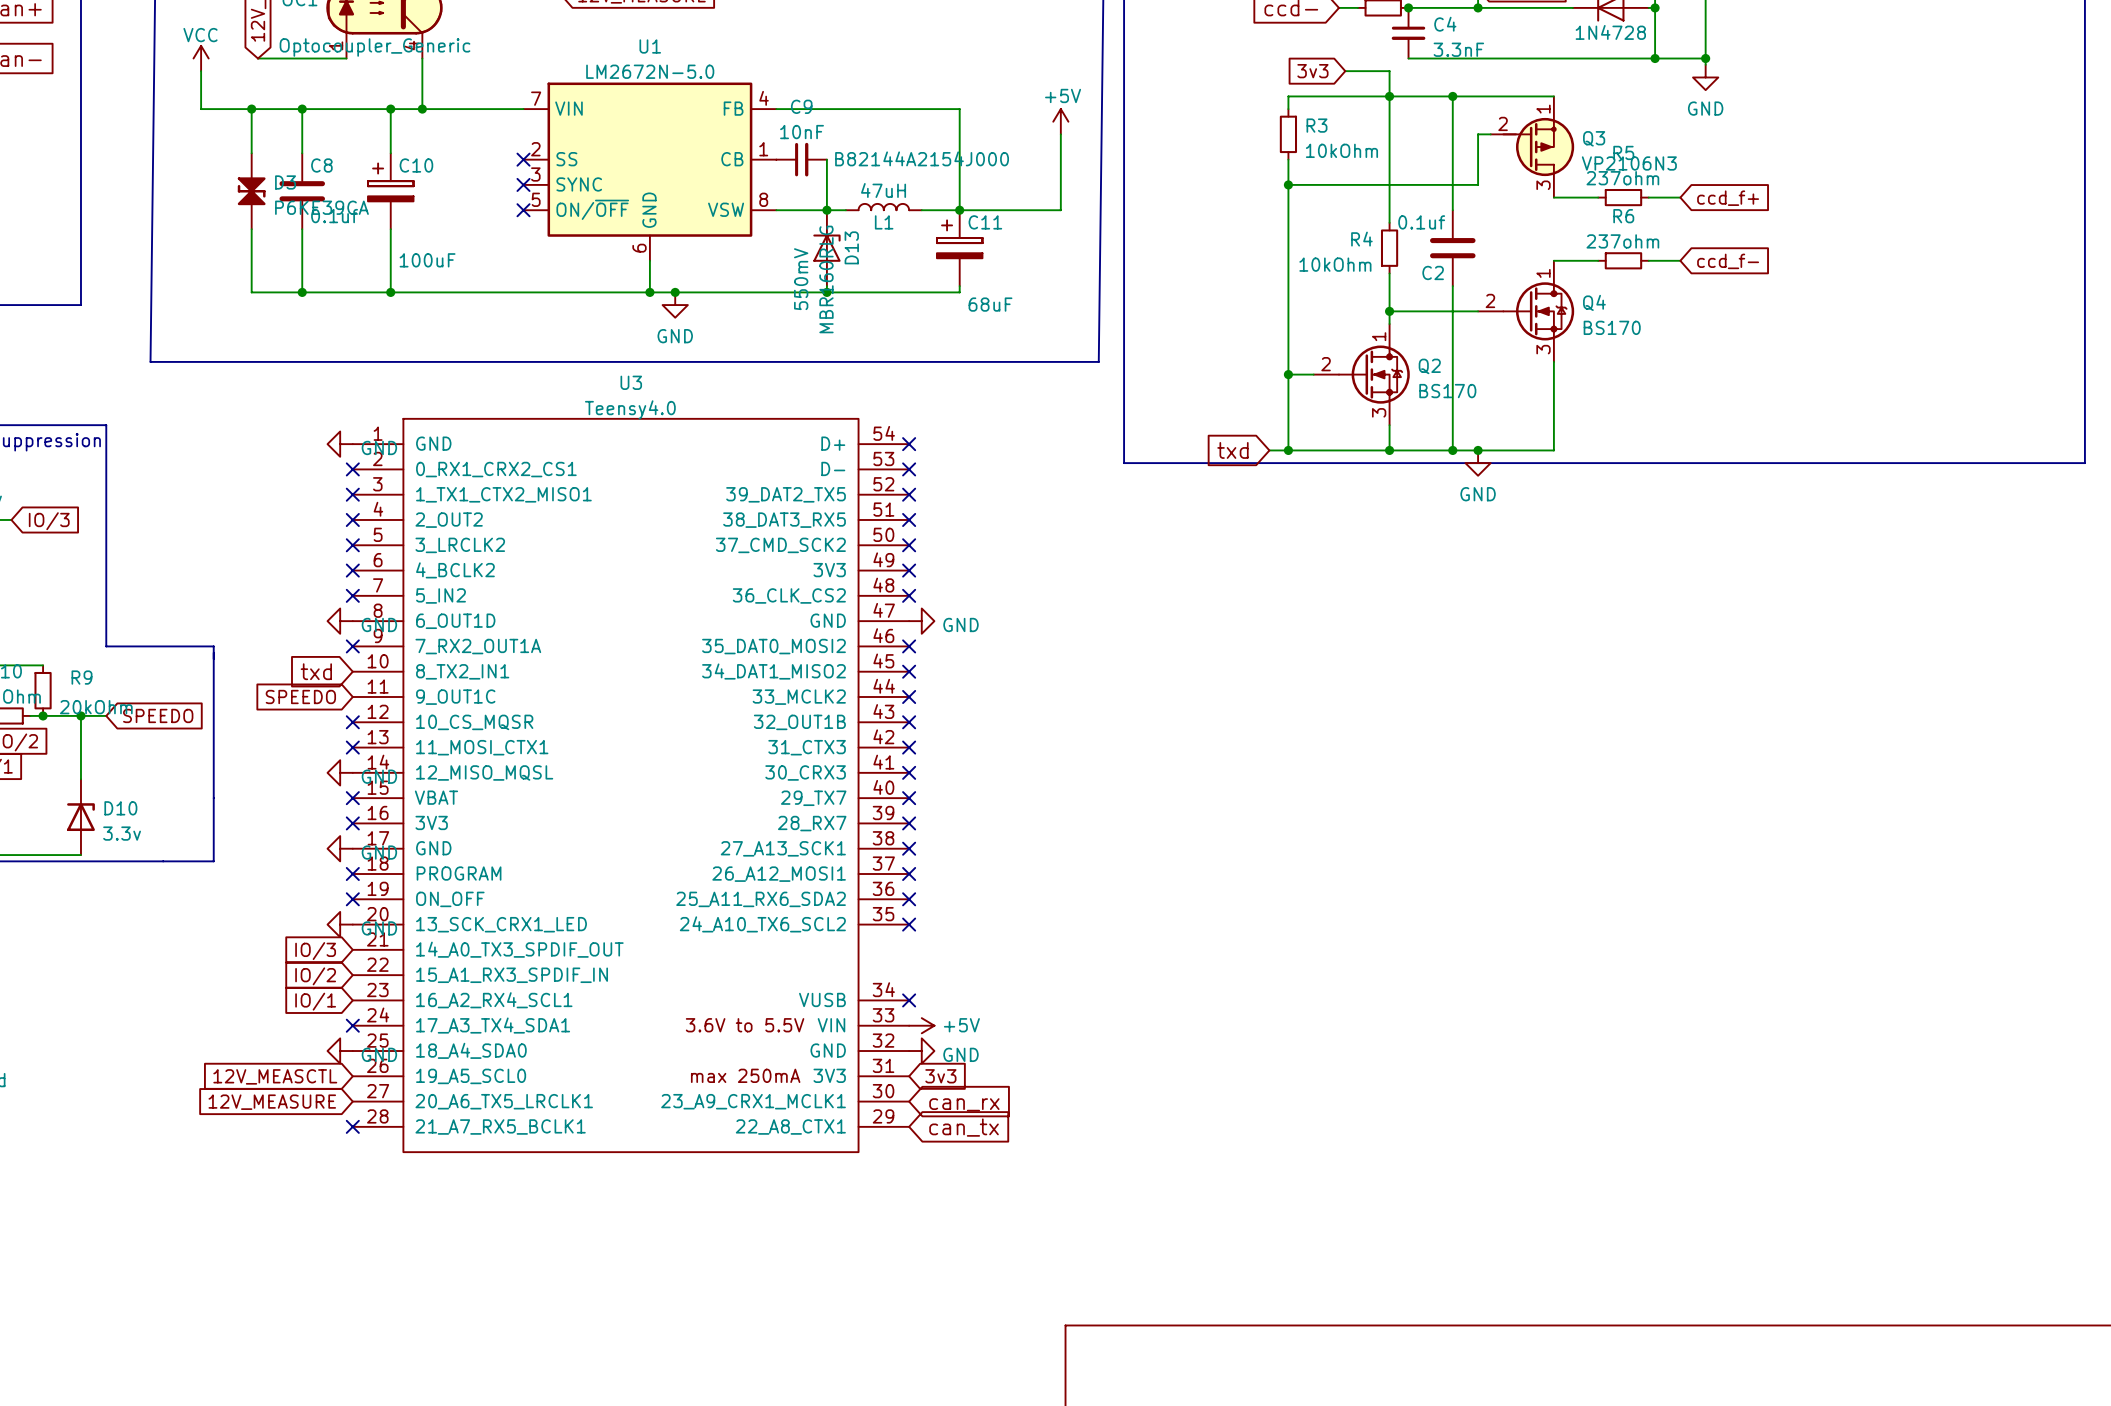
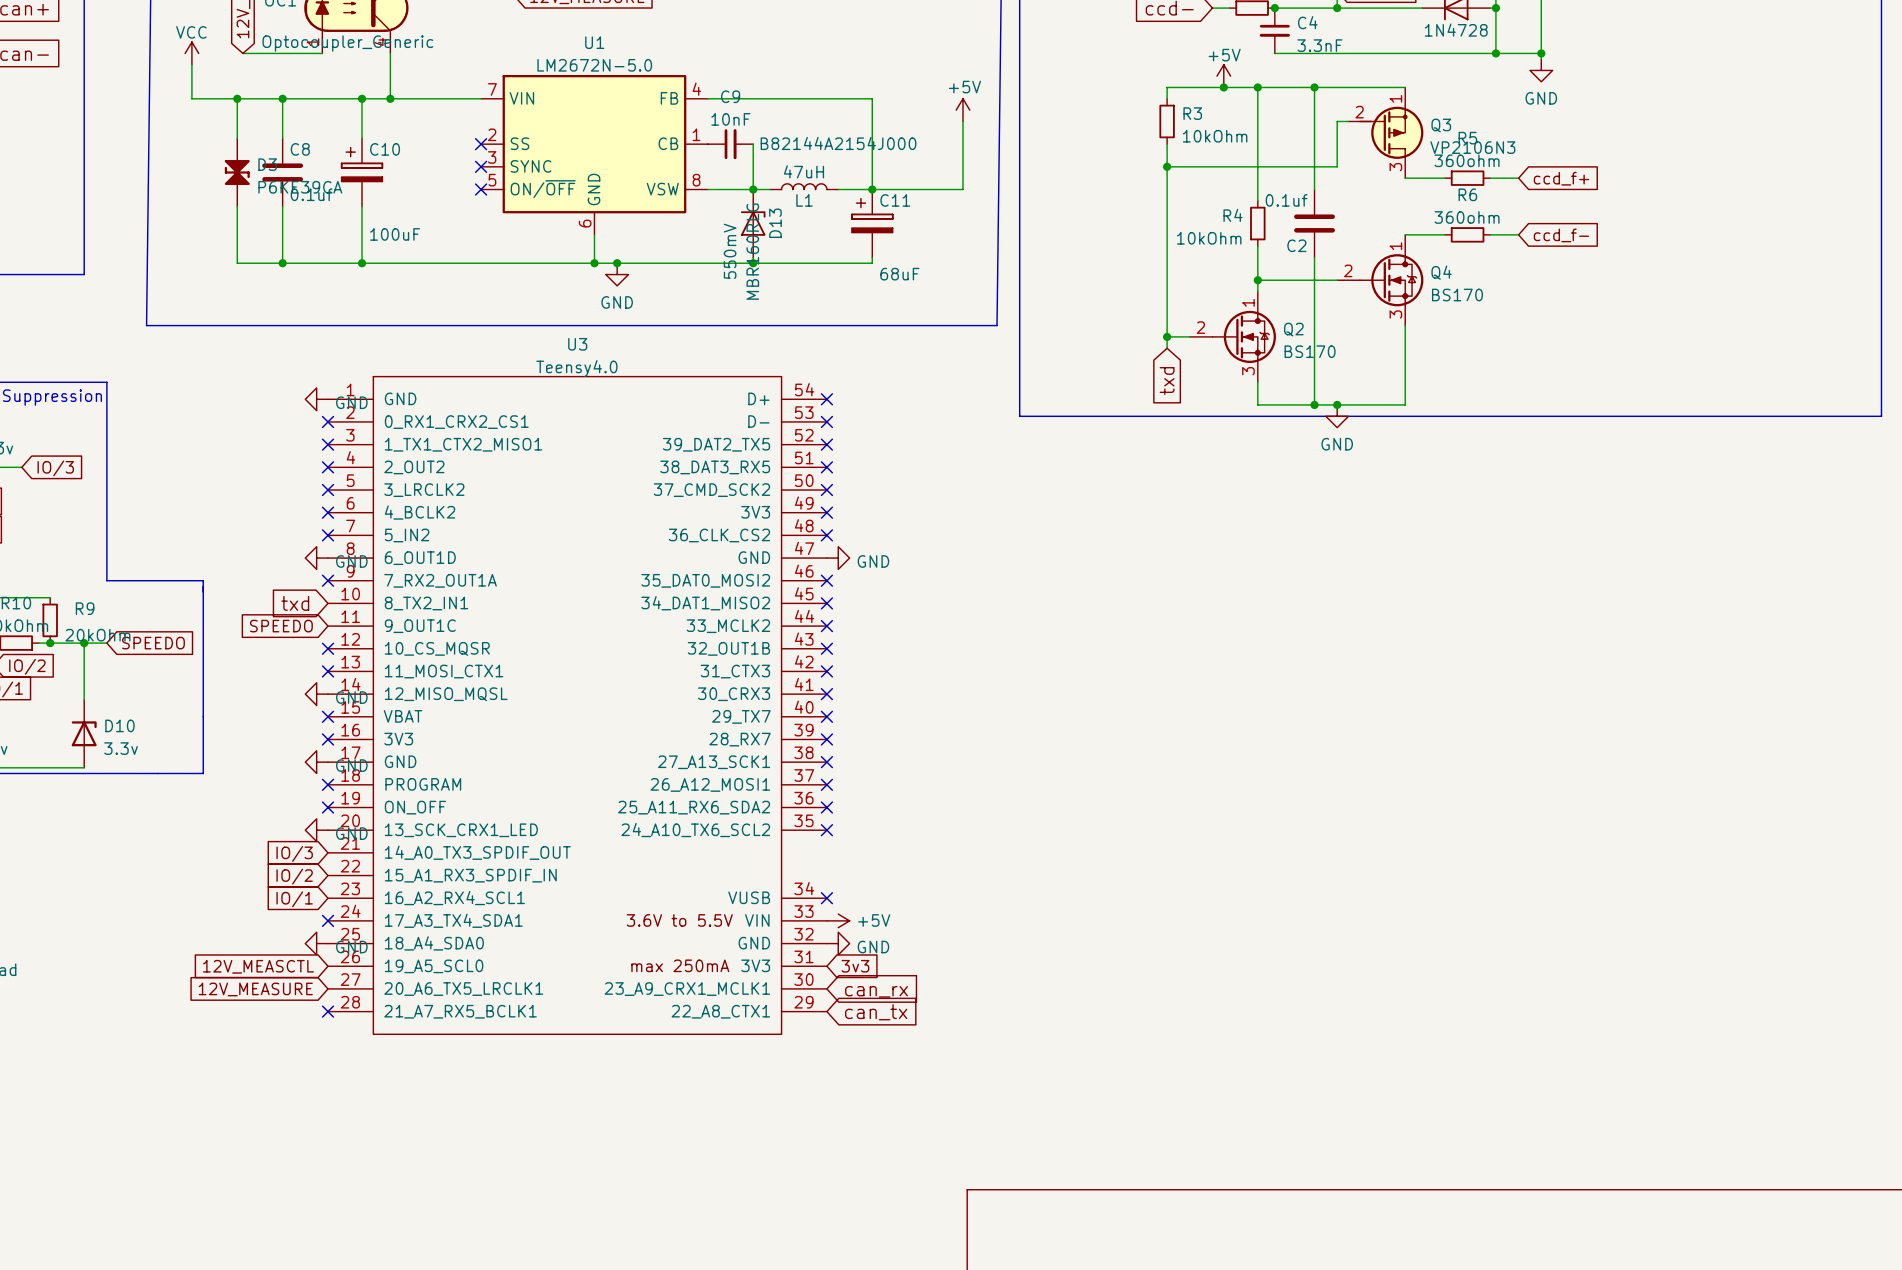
global label: 3v3 (1312, 71) -> none
wire: (1345, 71) (1389, 71) (1389, 96) -> none
power symbol: none -> +5V (1223, 76)
junction: none -> (1223, 87)
R5 value: 237ohm (1622, 178) -> 360ohm (1467, 160)
R6 value: 237ohm (1622, 241) -> 360ohm (1467, 217)
wire: (1288, 387) (1288, 450) -> none
global label rotation: 0° (1232, 450) -> 90° counterclockwise (1167, 380)
wire: (1269, 450) (1389, 450) -> none
junction: (1288, 450) -> none
junction: (1389, 450) -> none

